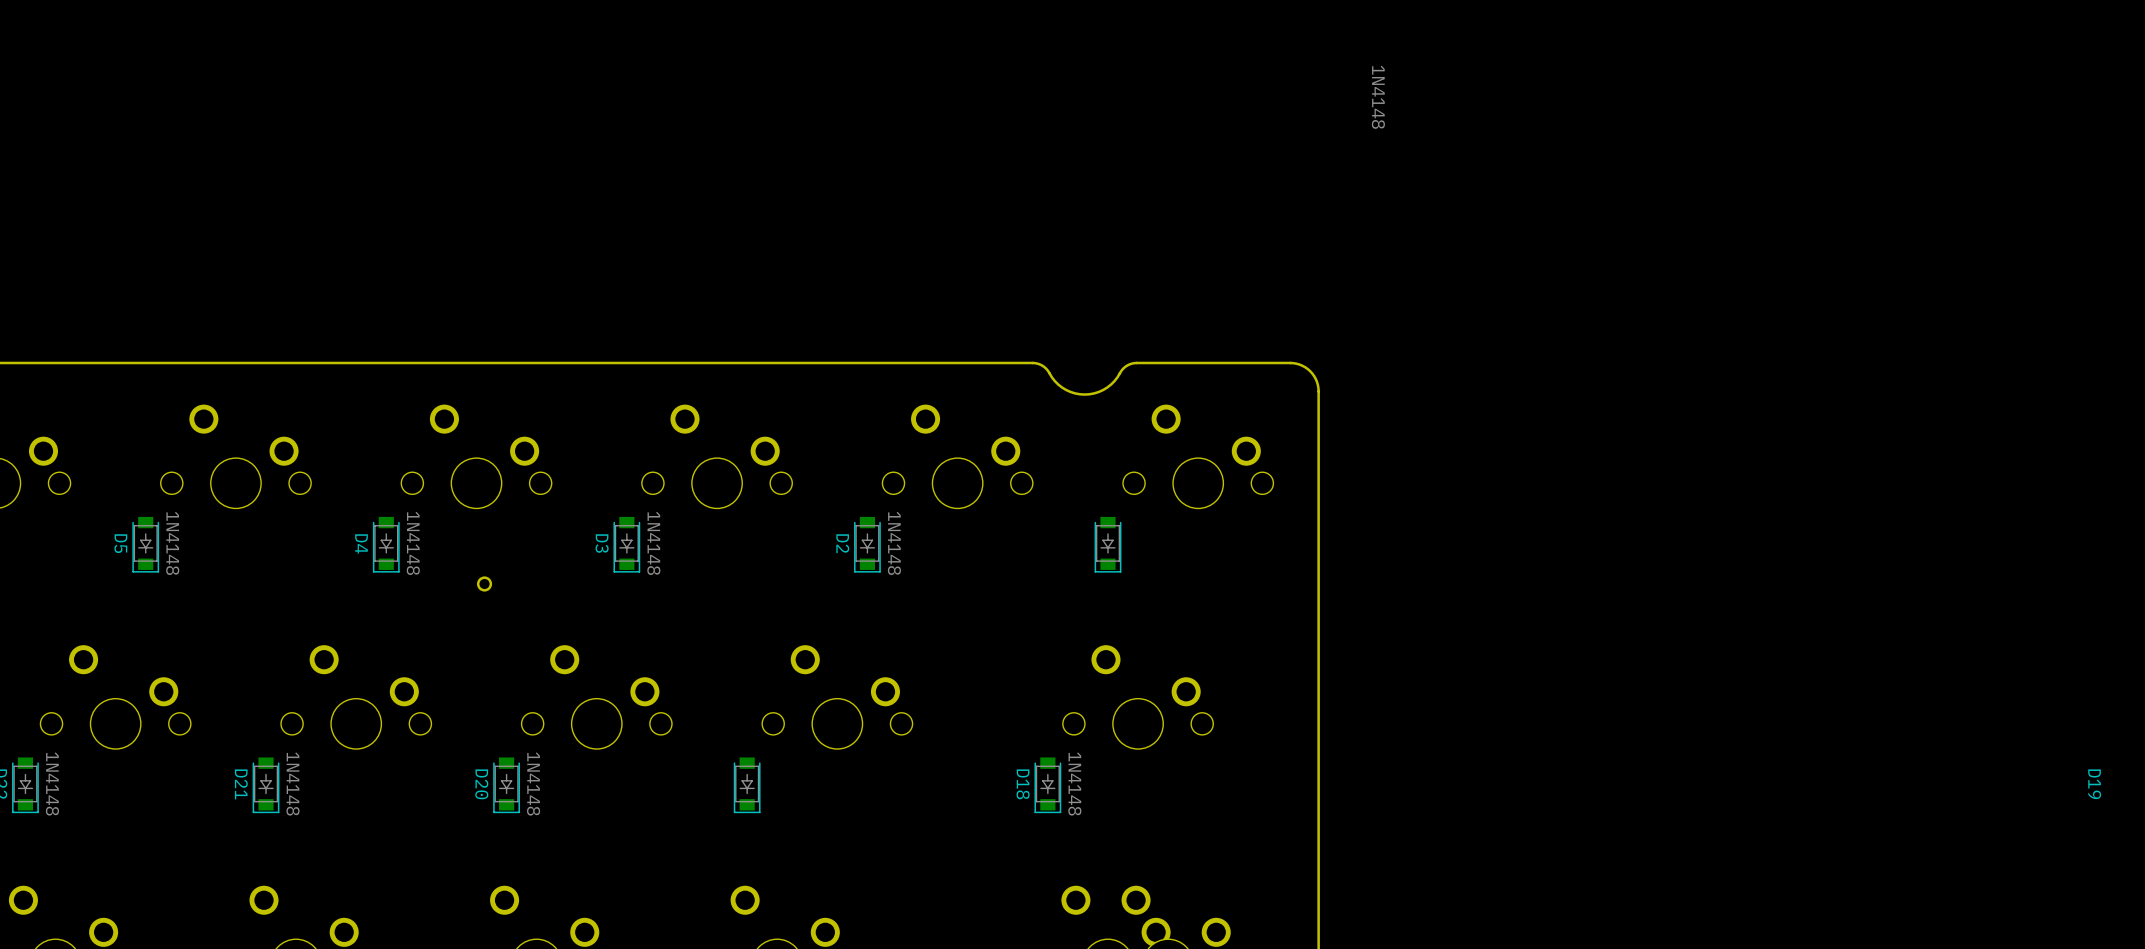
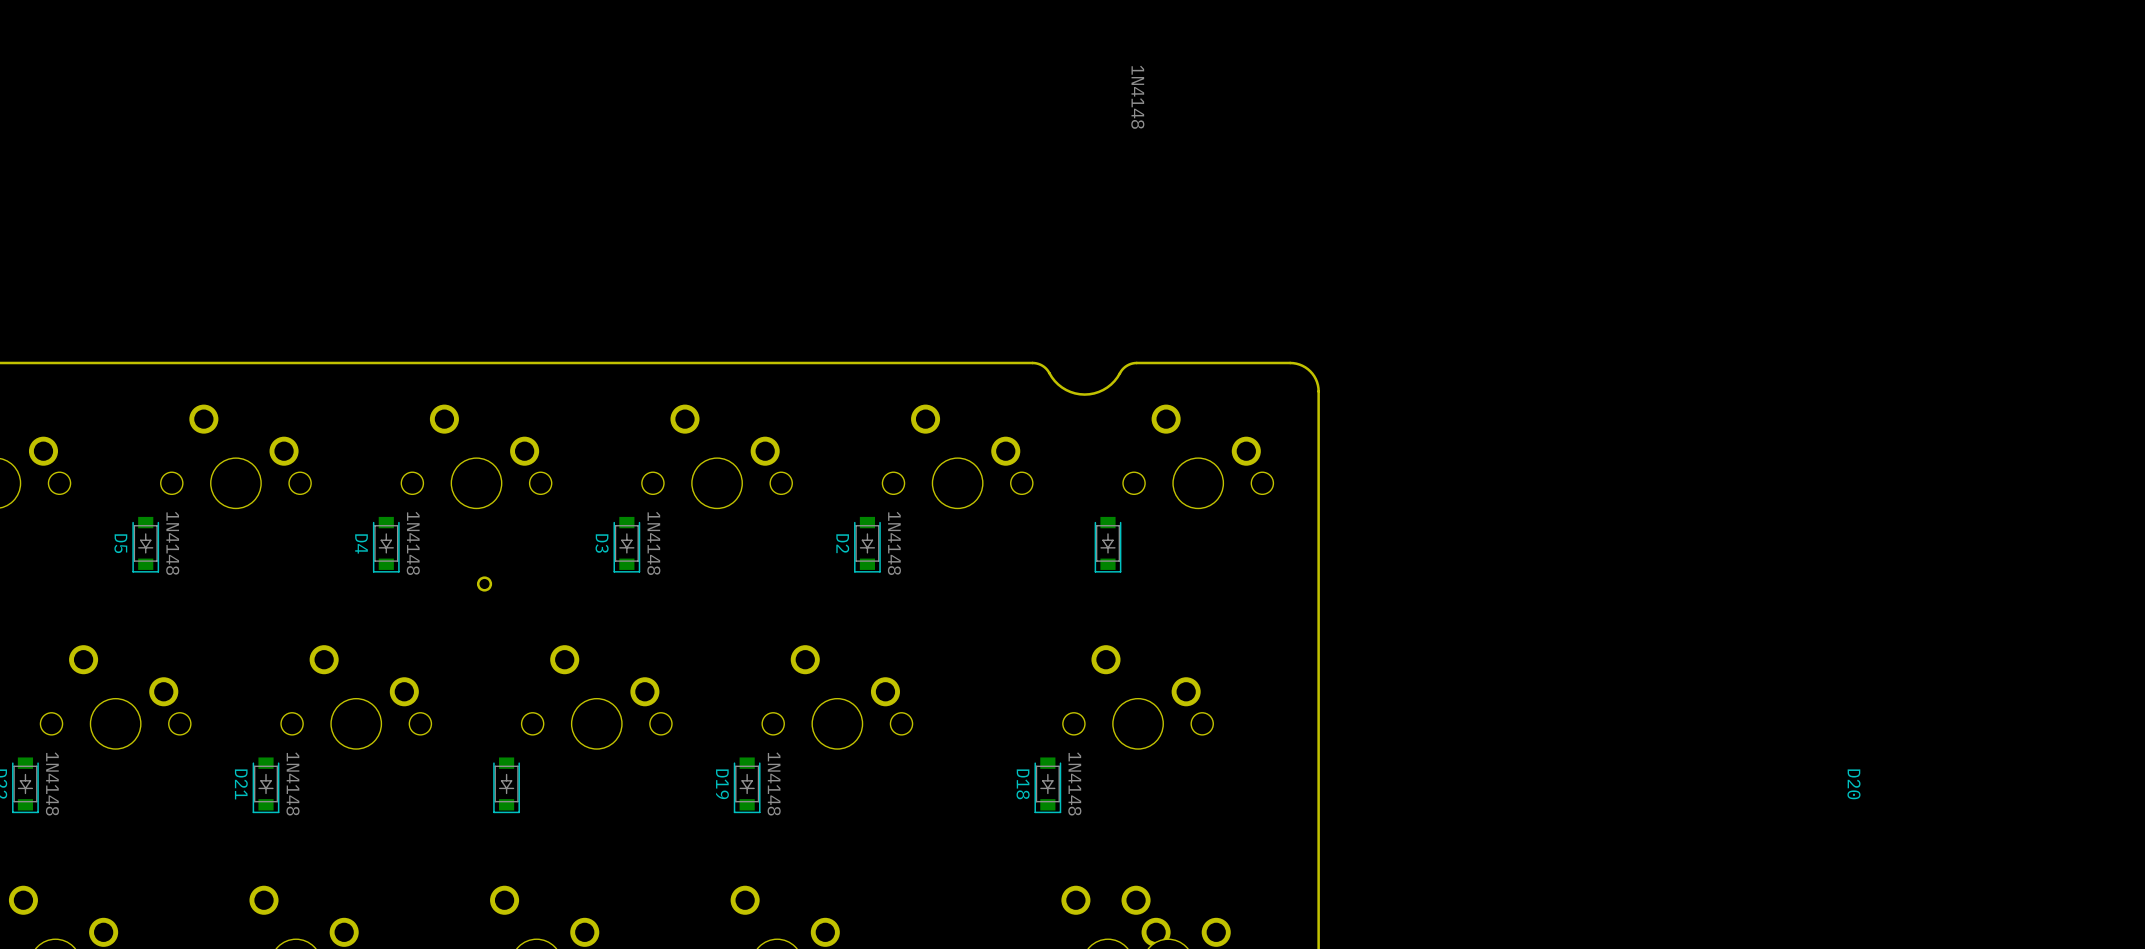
D19 value position: 1N4148 (1378, 97) -> 1N4148 (774, 783)
D20 value position: 1N4148 (533, 783) -> 1N4148 (1137, 97)
D20 name position: D20 (481, 784) -> D20 (1853, 784)
D19 name position: D19 (2094, 784) -> D19 (722, 784)

